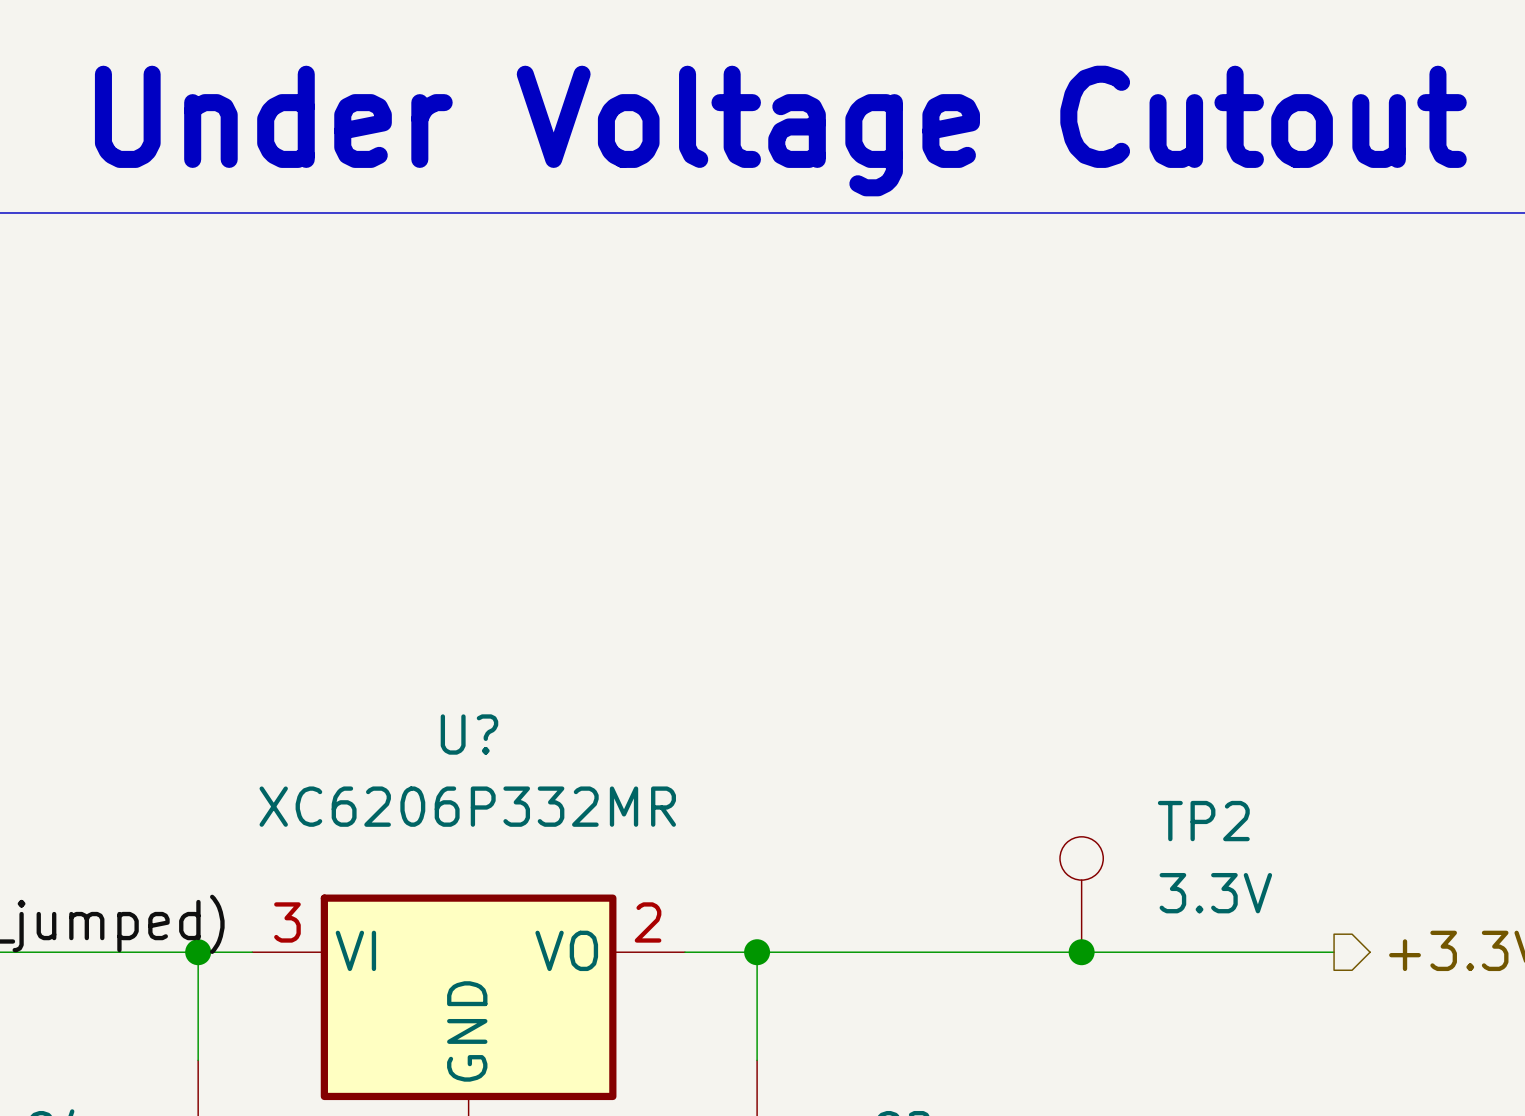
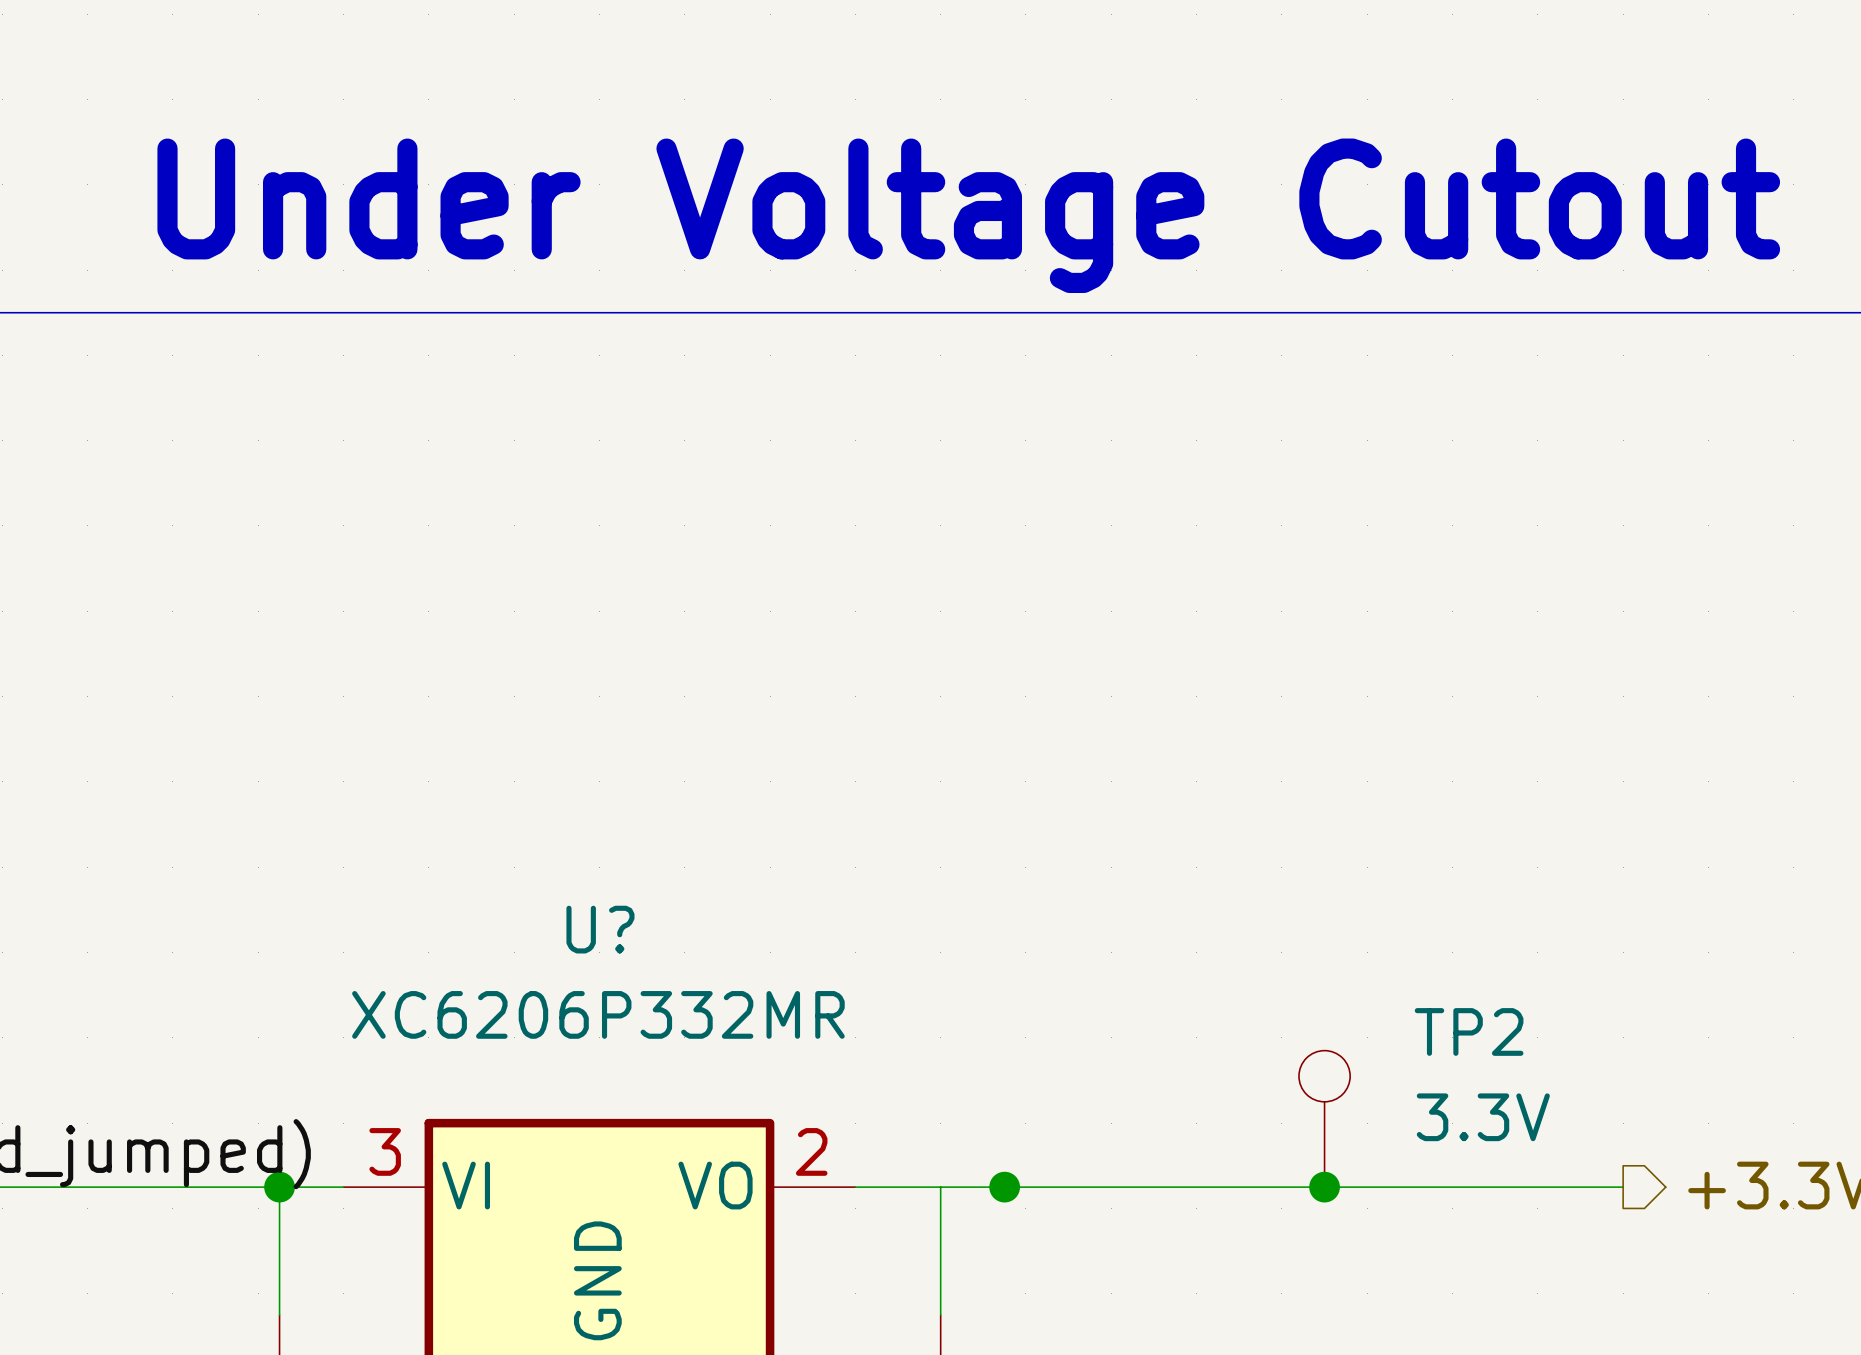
junction position: (757, 952) -> (1004, 1187)

